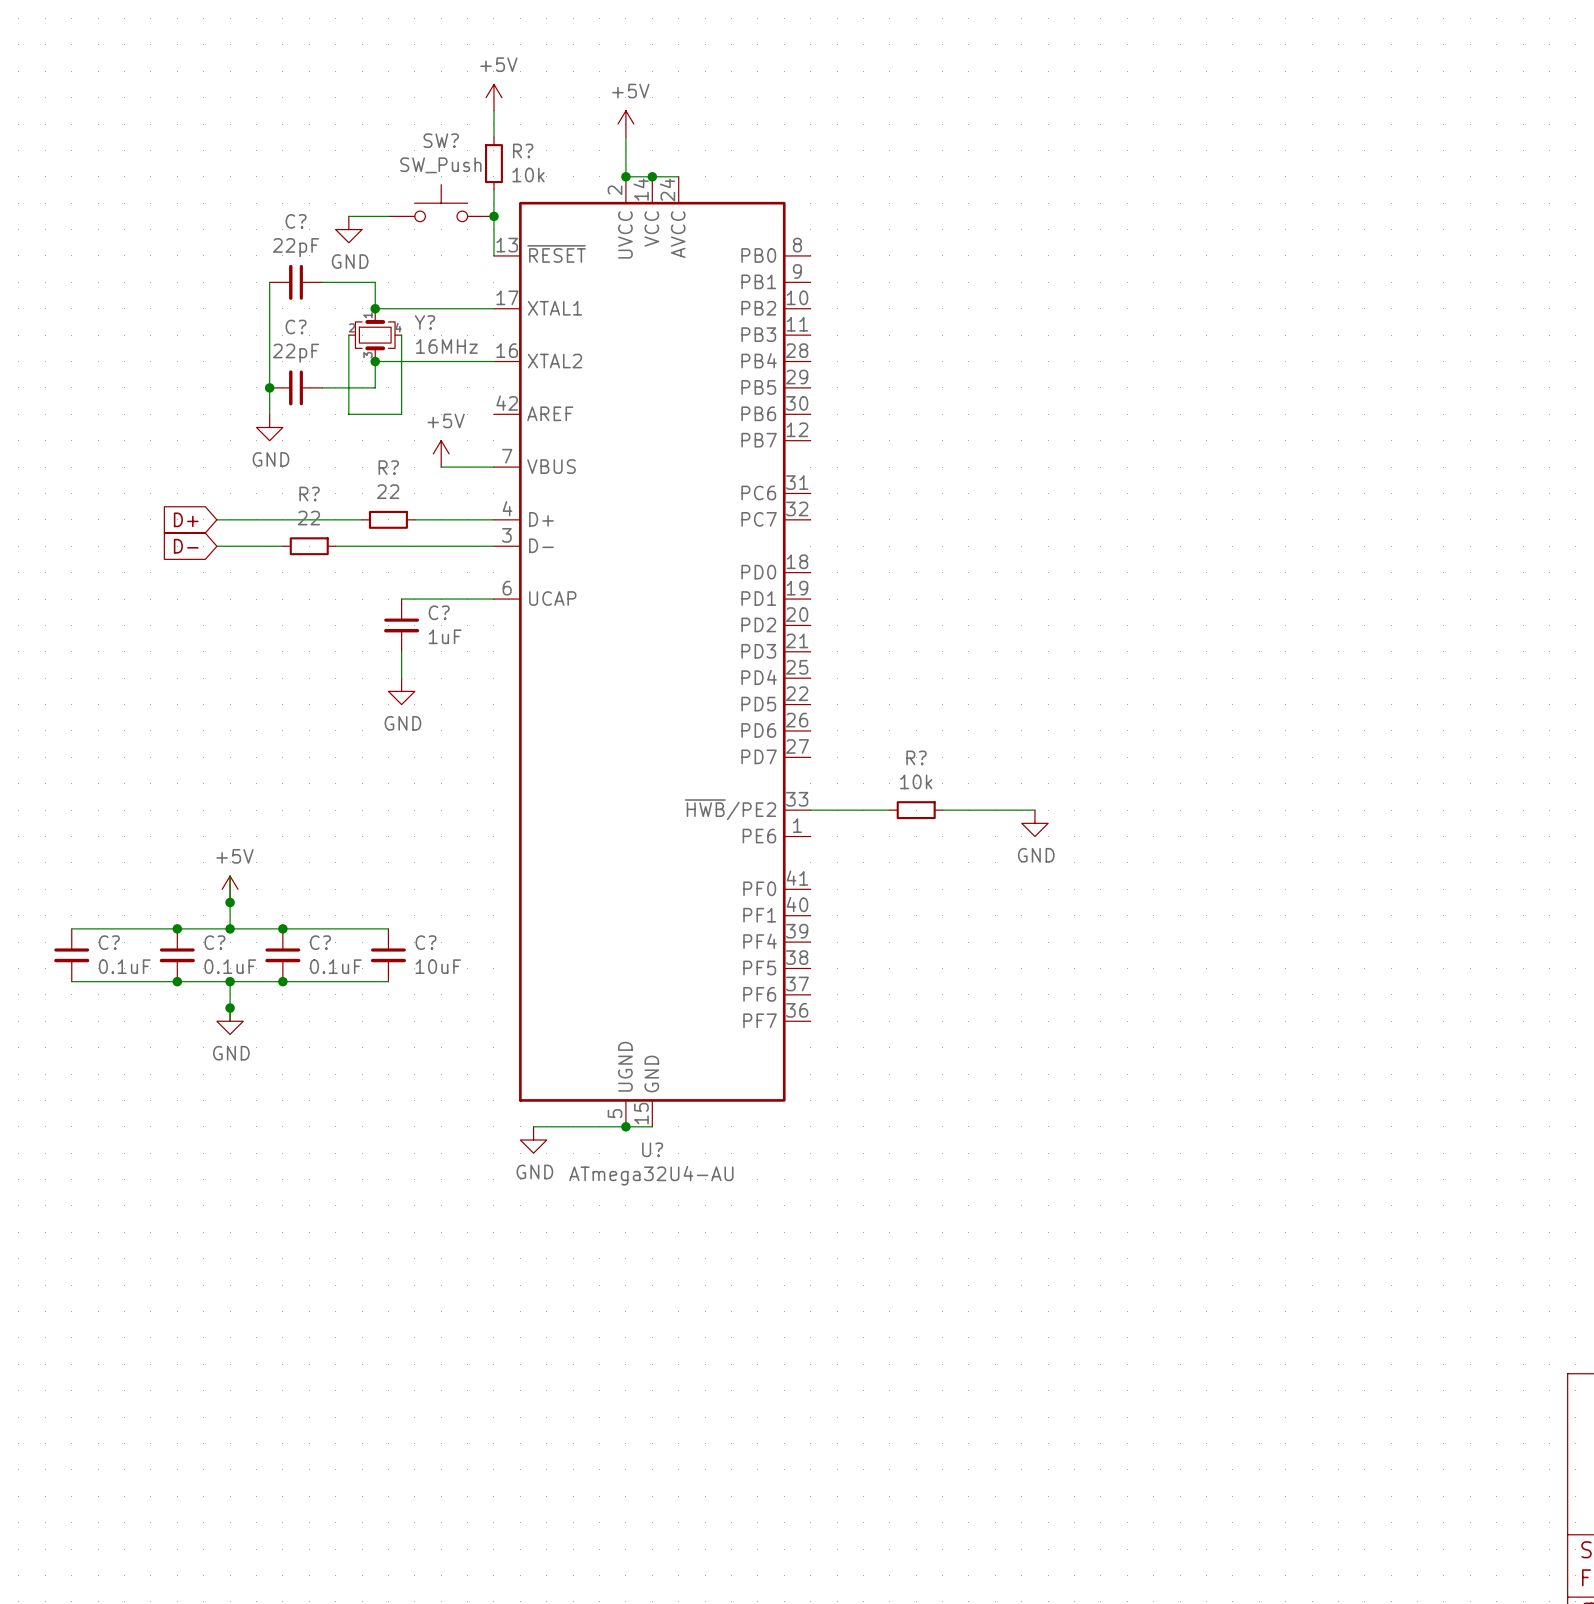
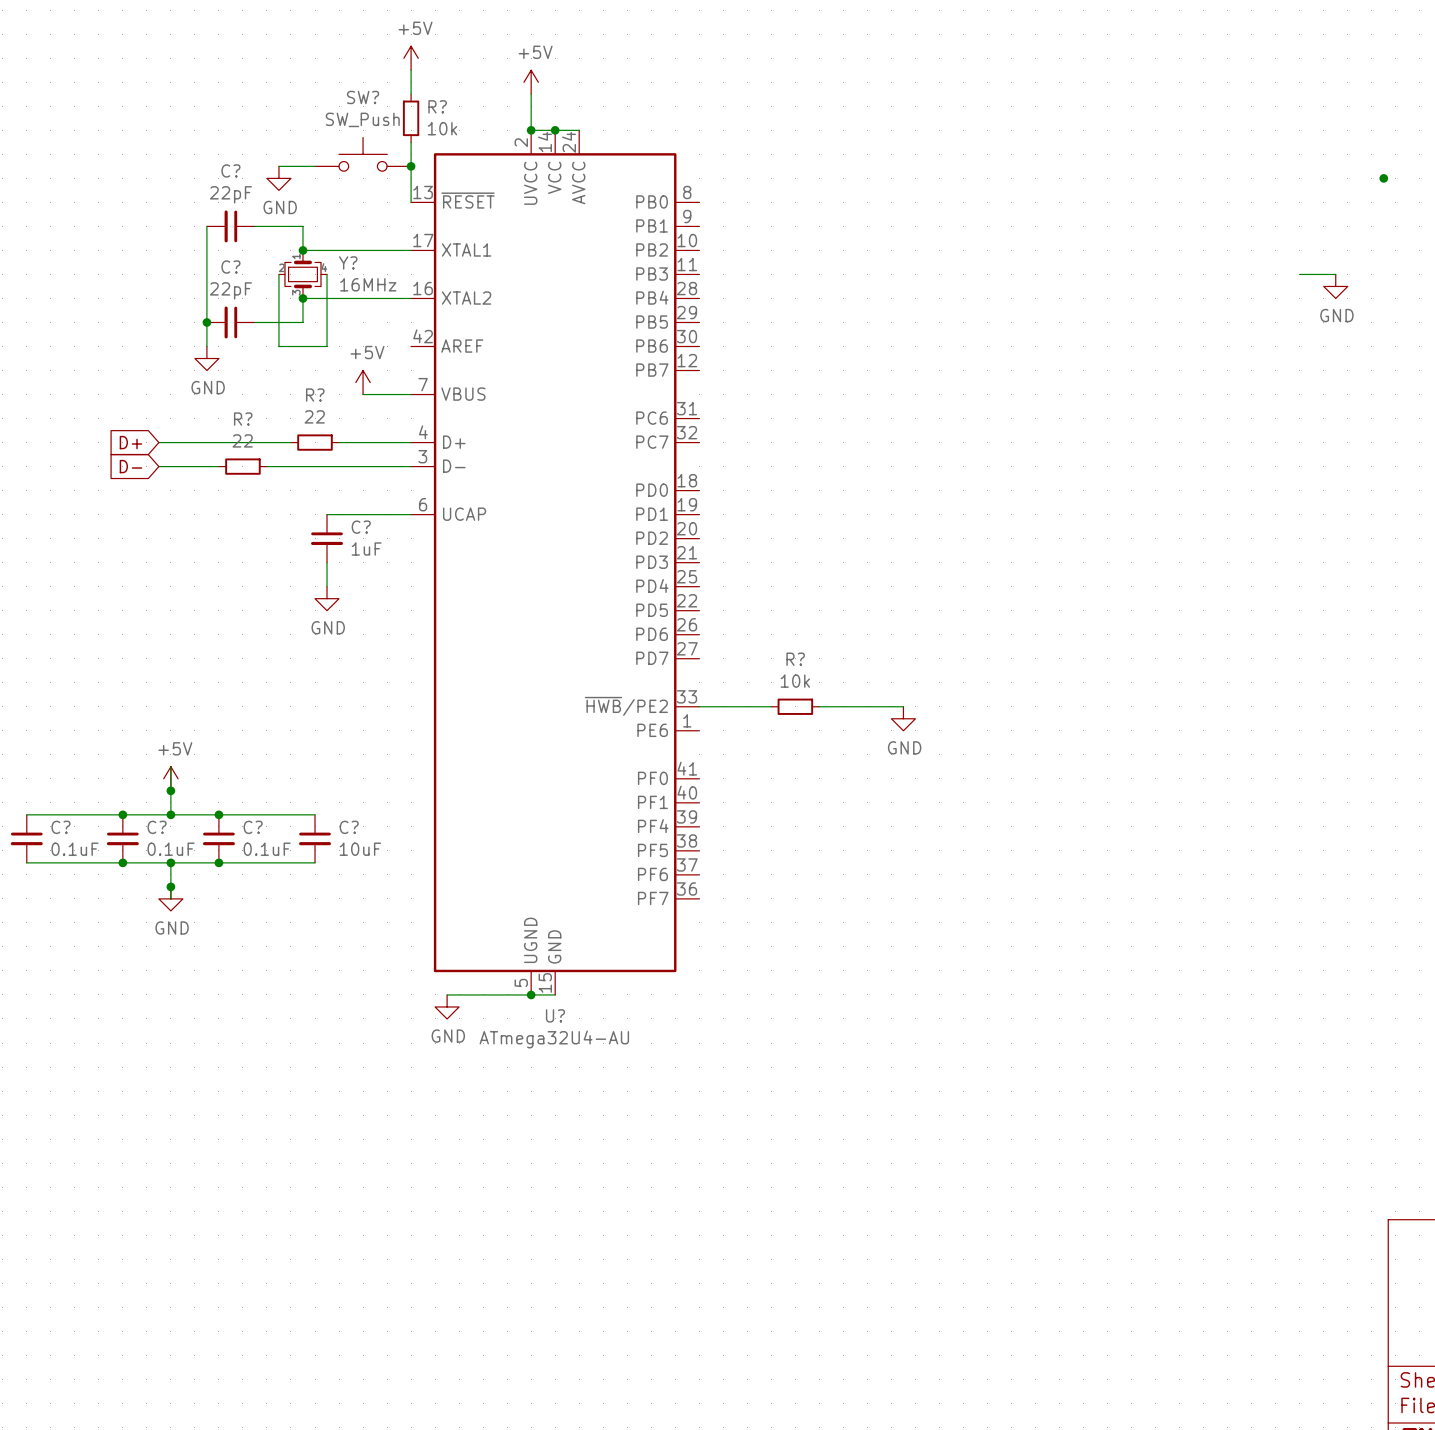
junction: none -> (1383, 178)
wire: none -> (1299, 274) (1335, 274)
power symbol: none -> GND (1335, 286)

